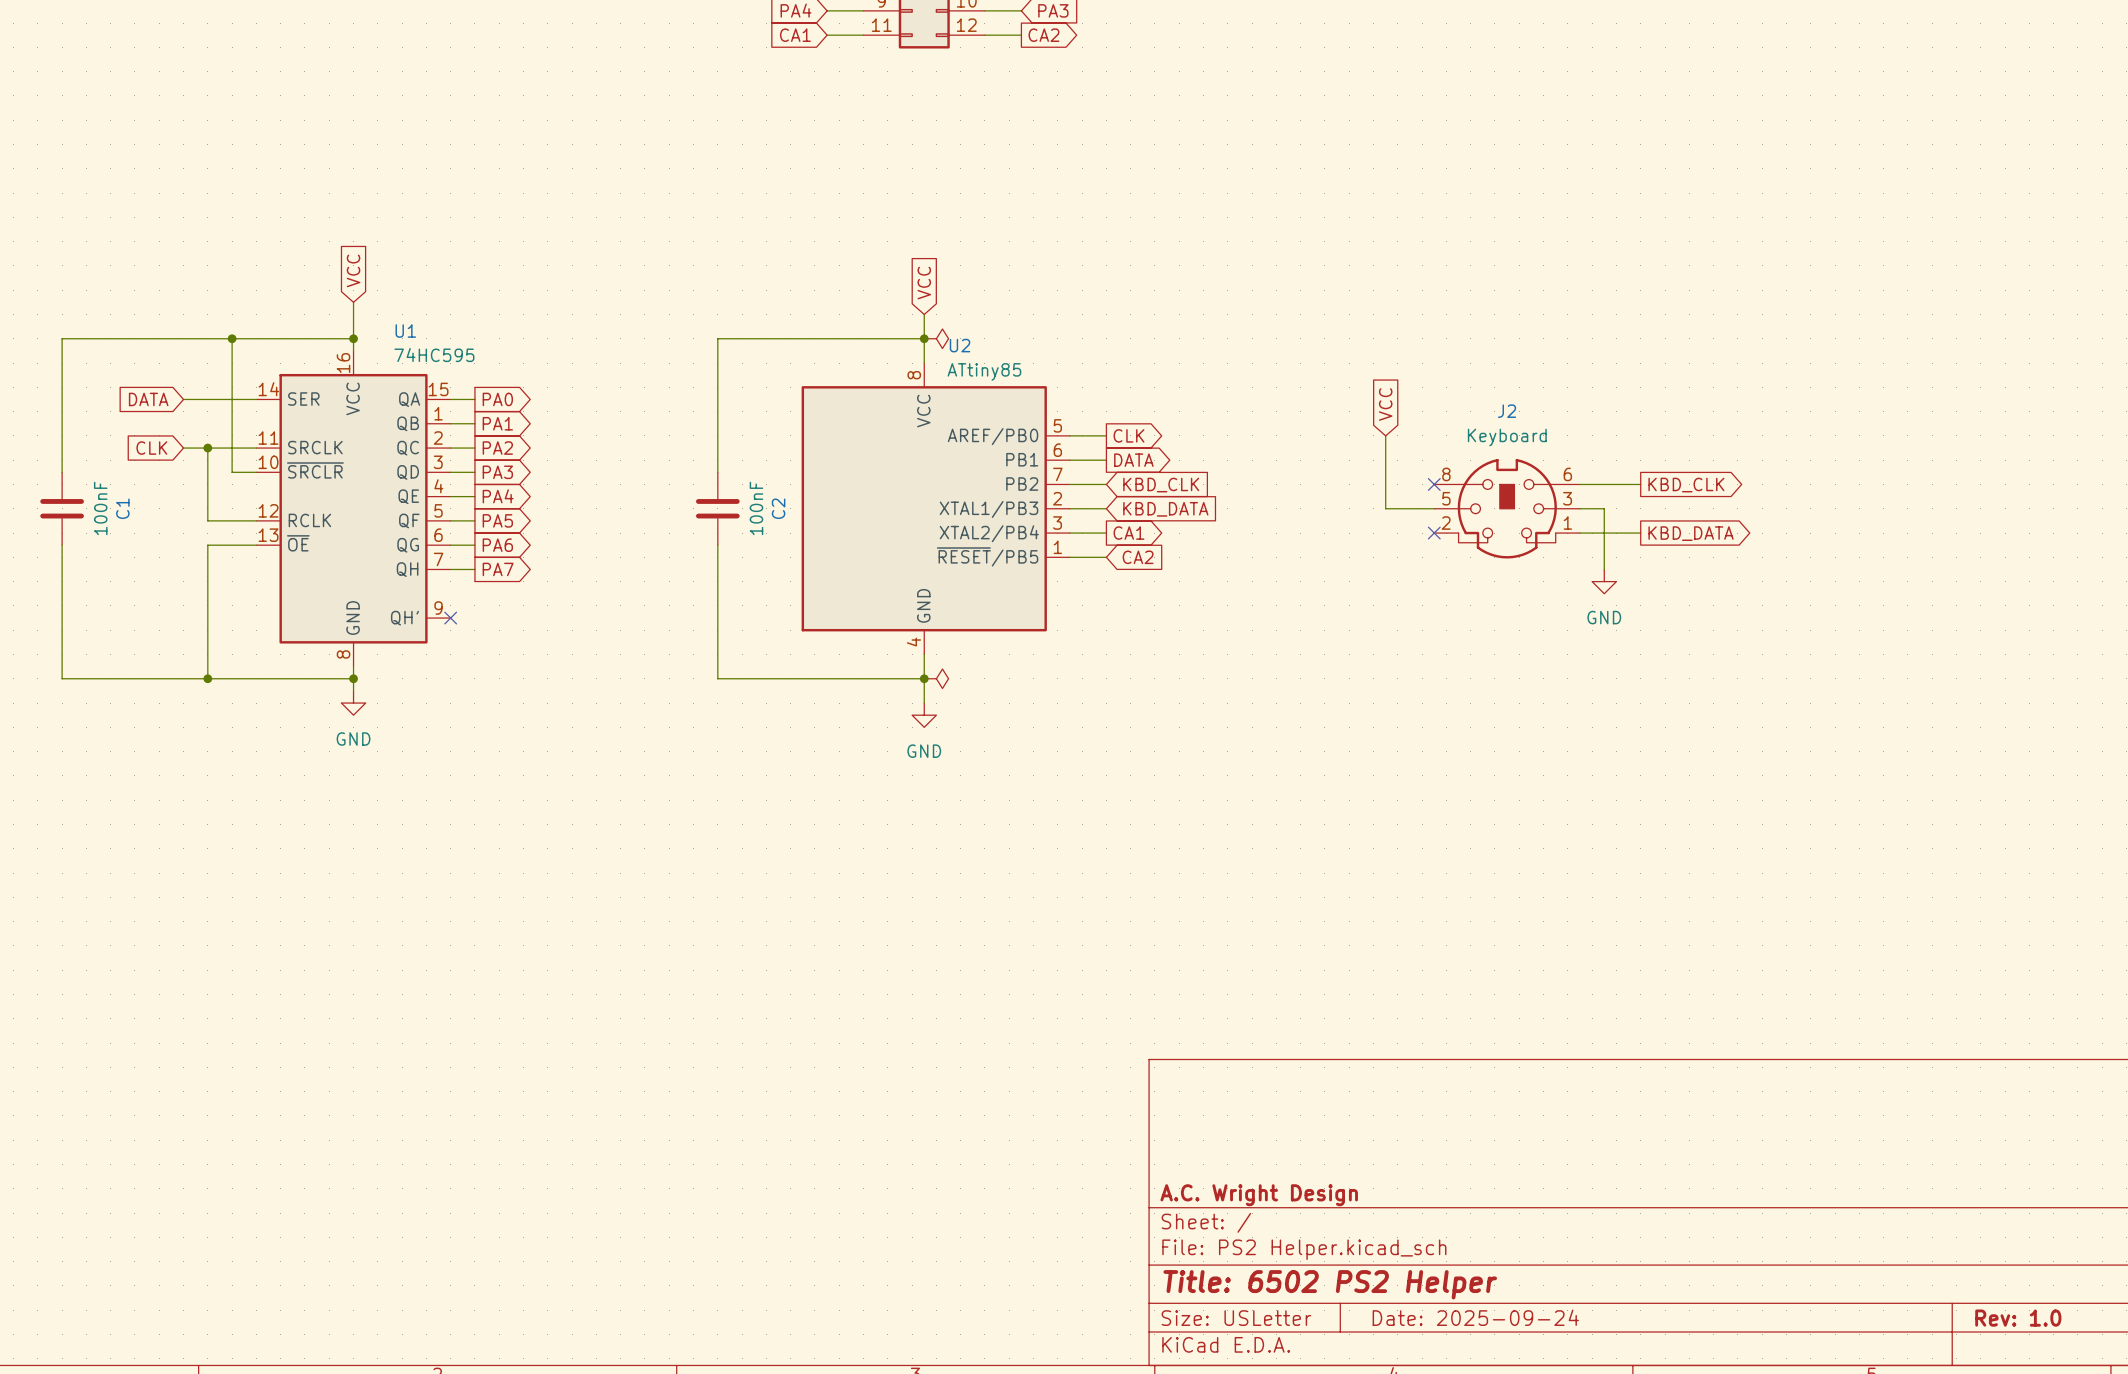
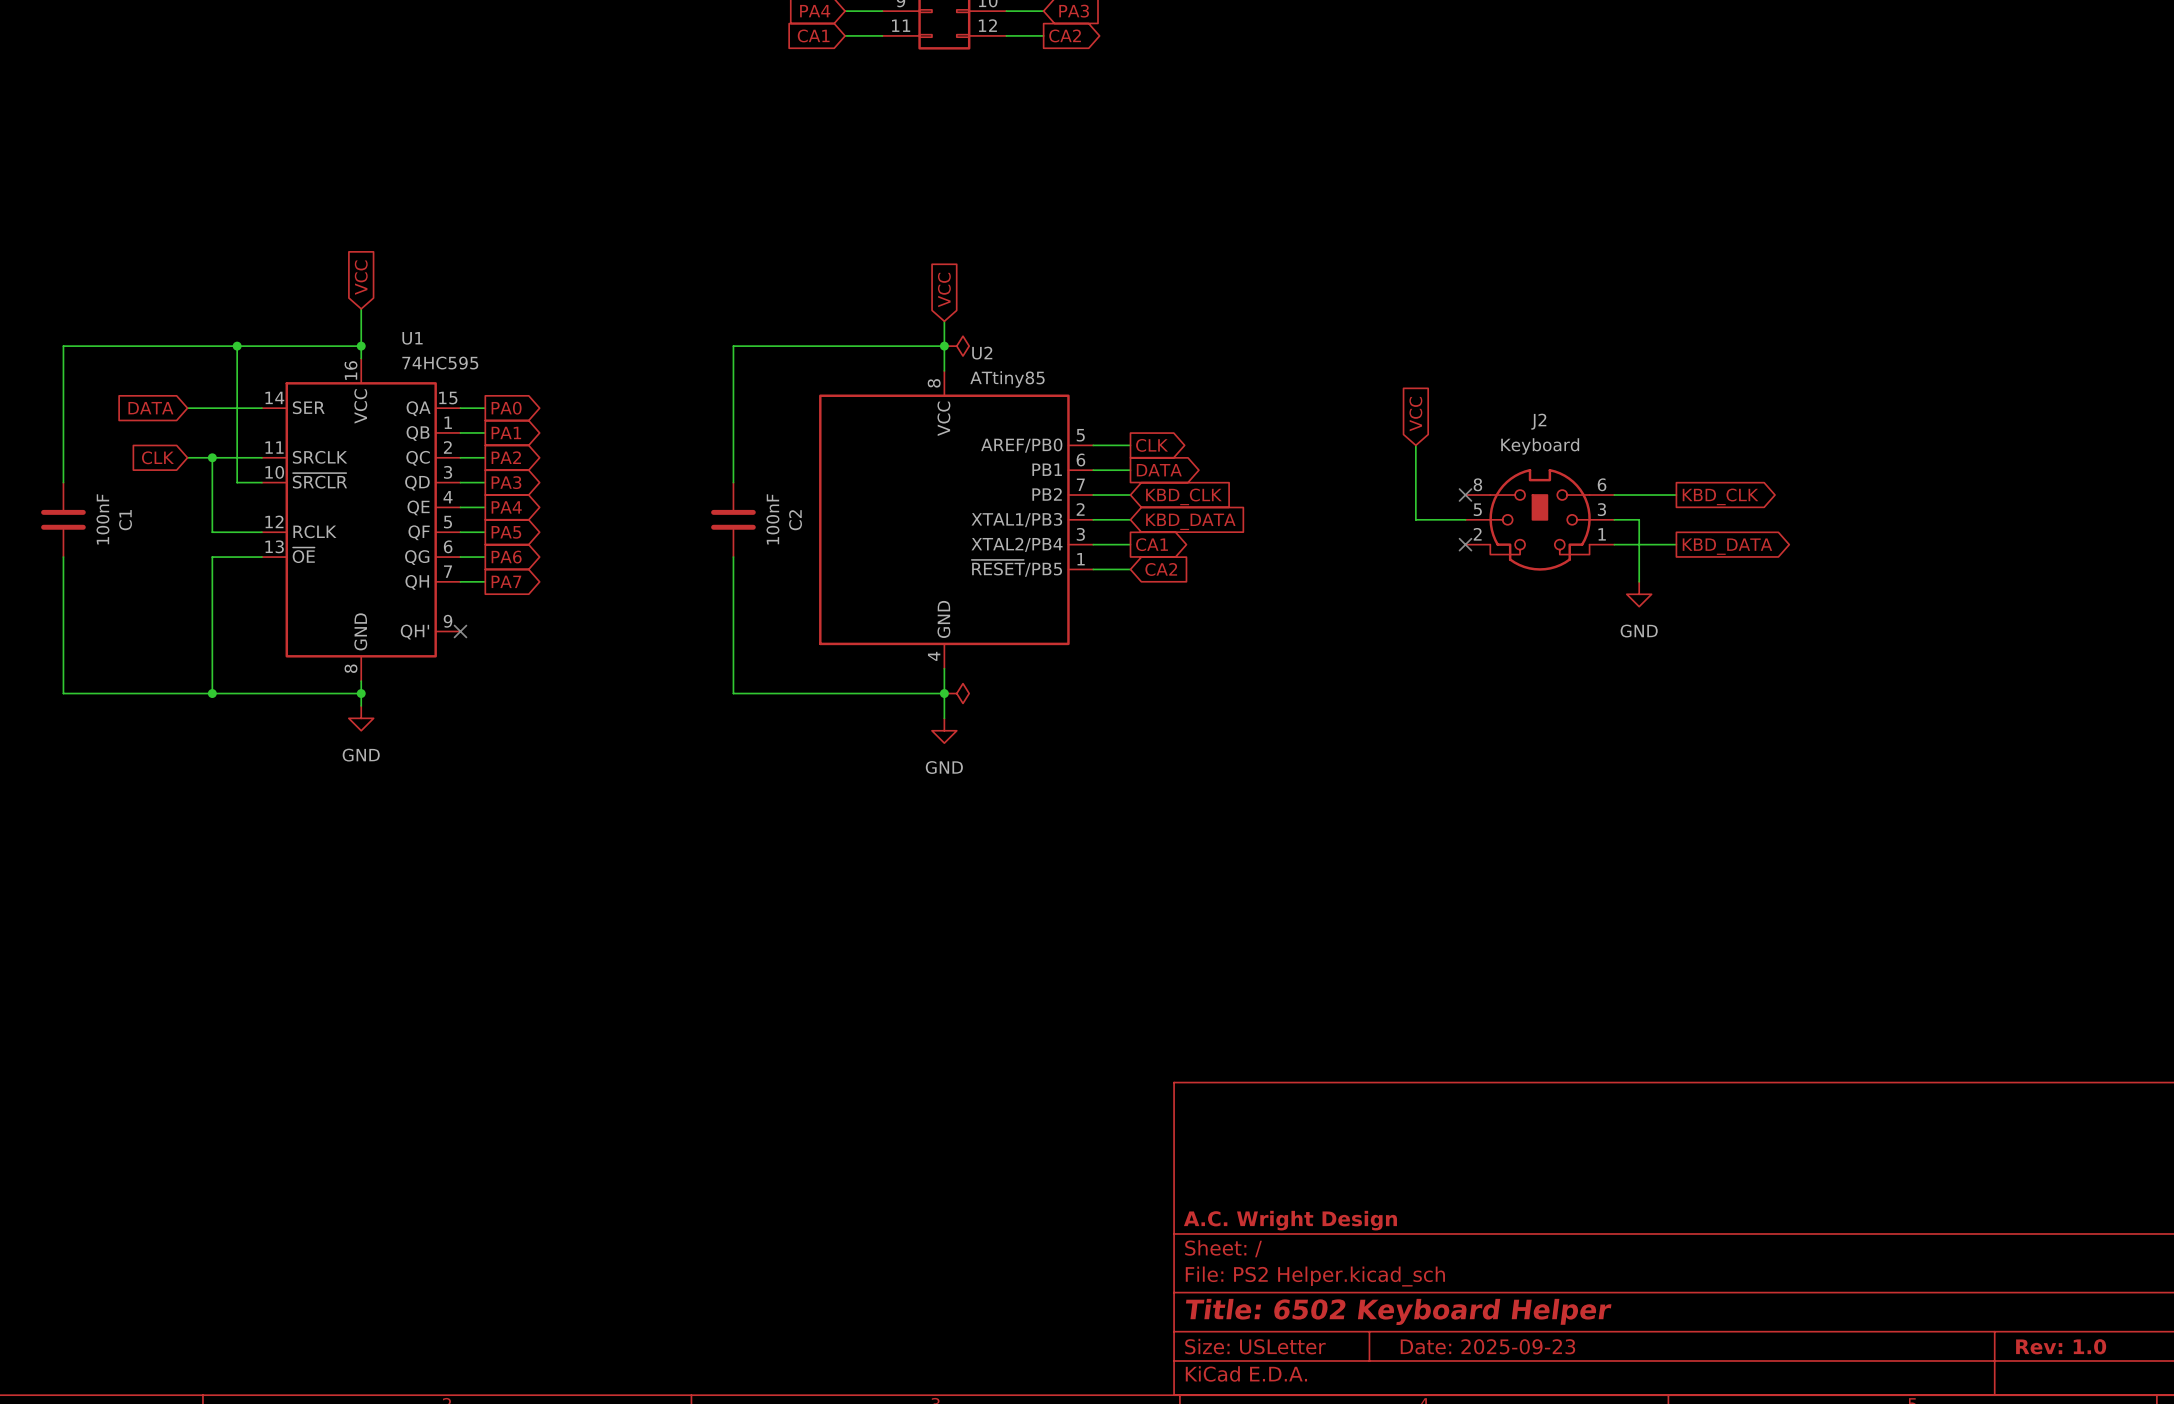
title block: Title: 6502 PS2 Helper (1330, 1284) -> Title: 6502 Keyboard Helper (1398, 1311)
title block: Date: 2025-09-24 (1475, 1317) -> Date: 2025-09-23 (1487, 1346)

